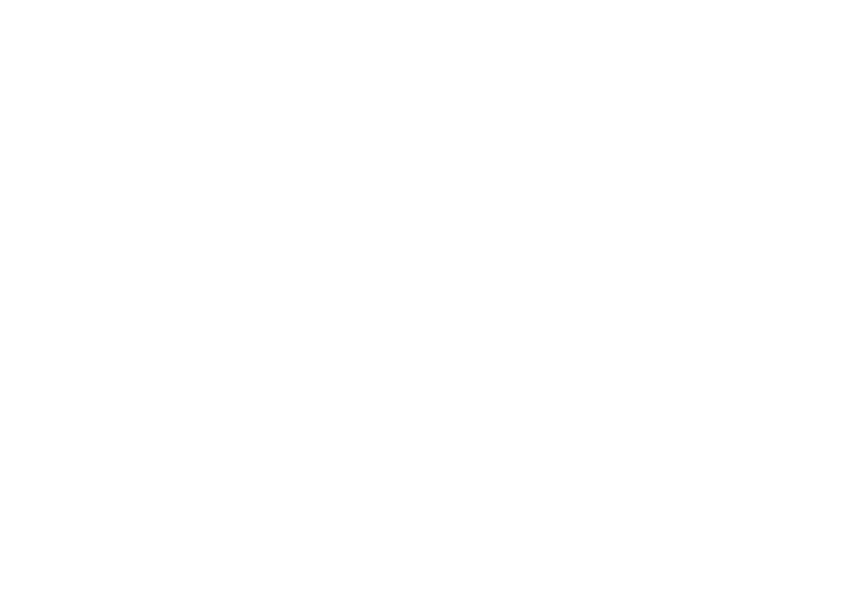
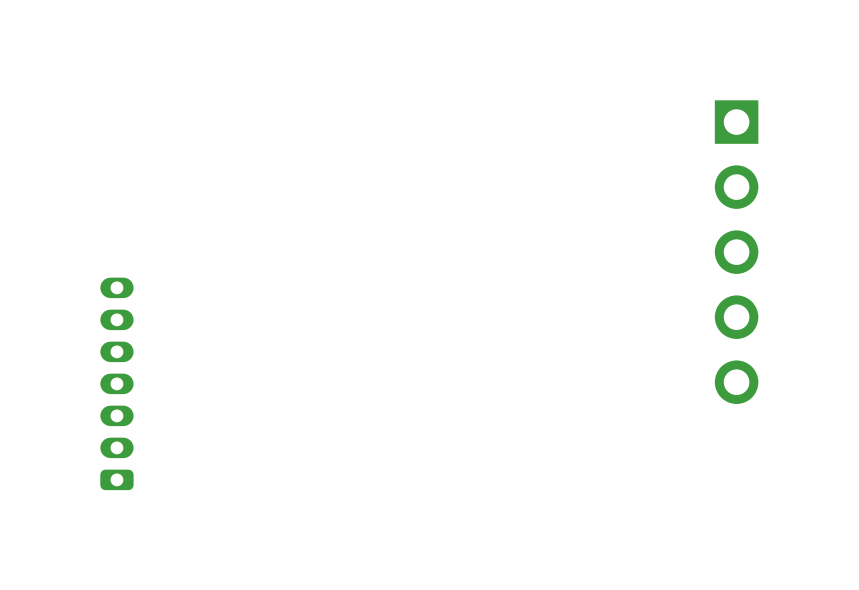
part: none -> (736, 252)
part: none -> (116, 383)

